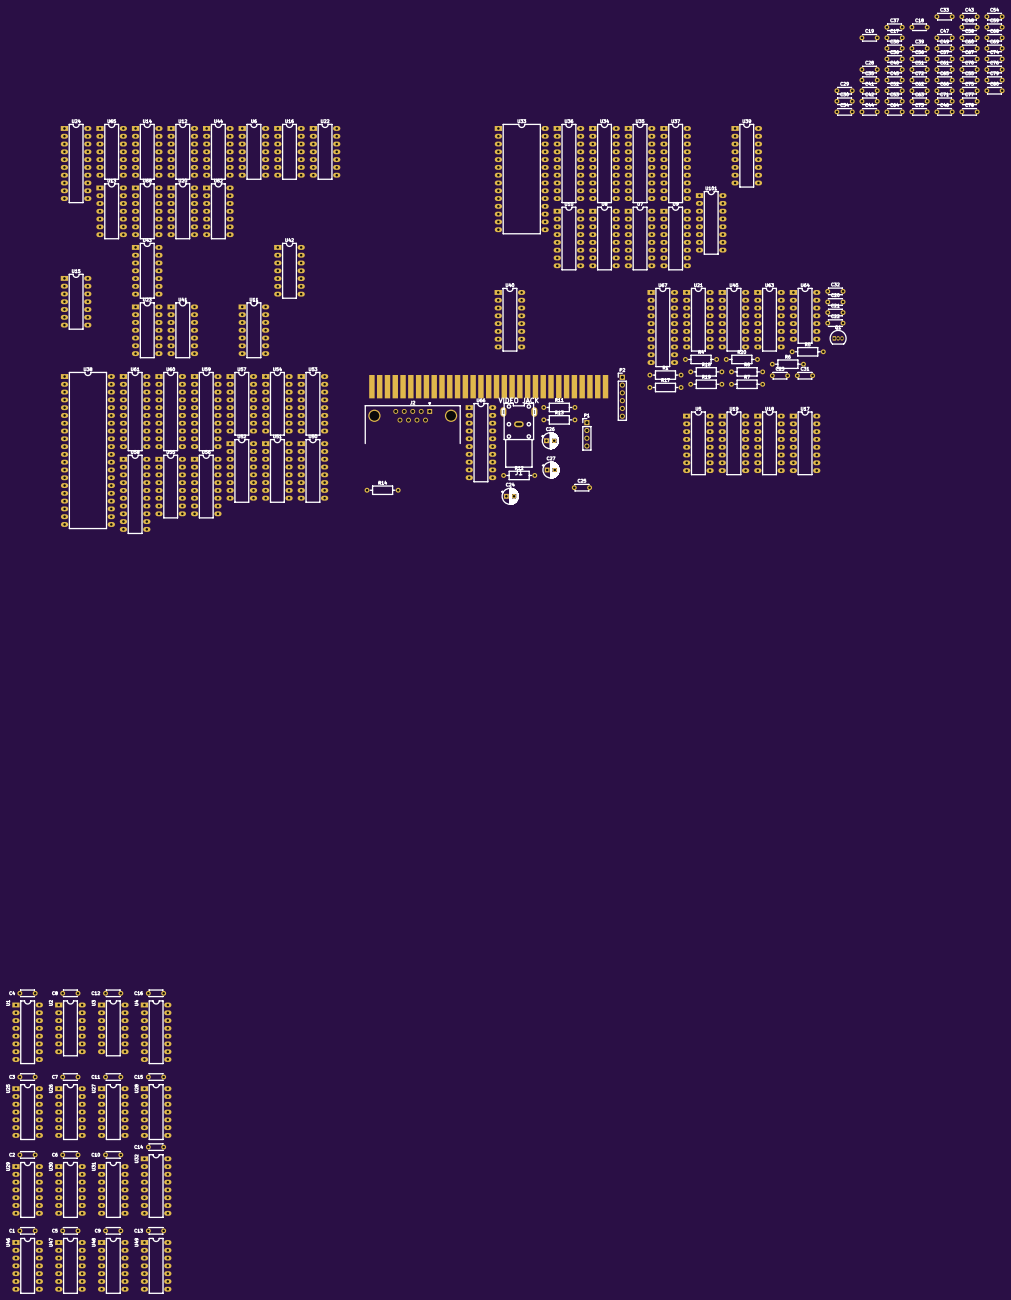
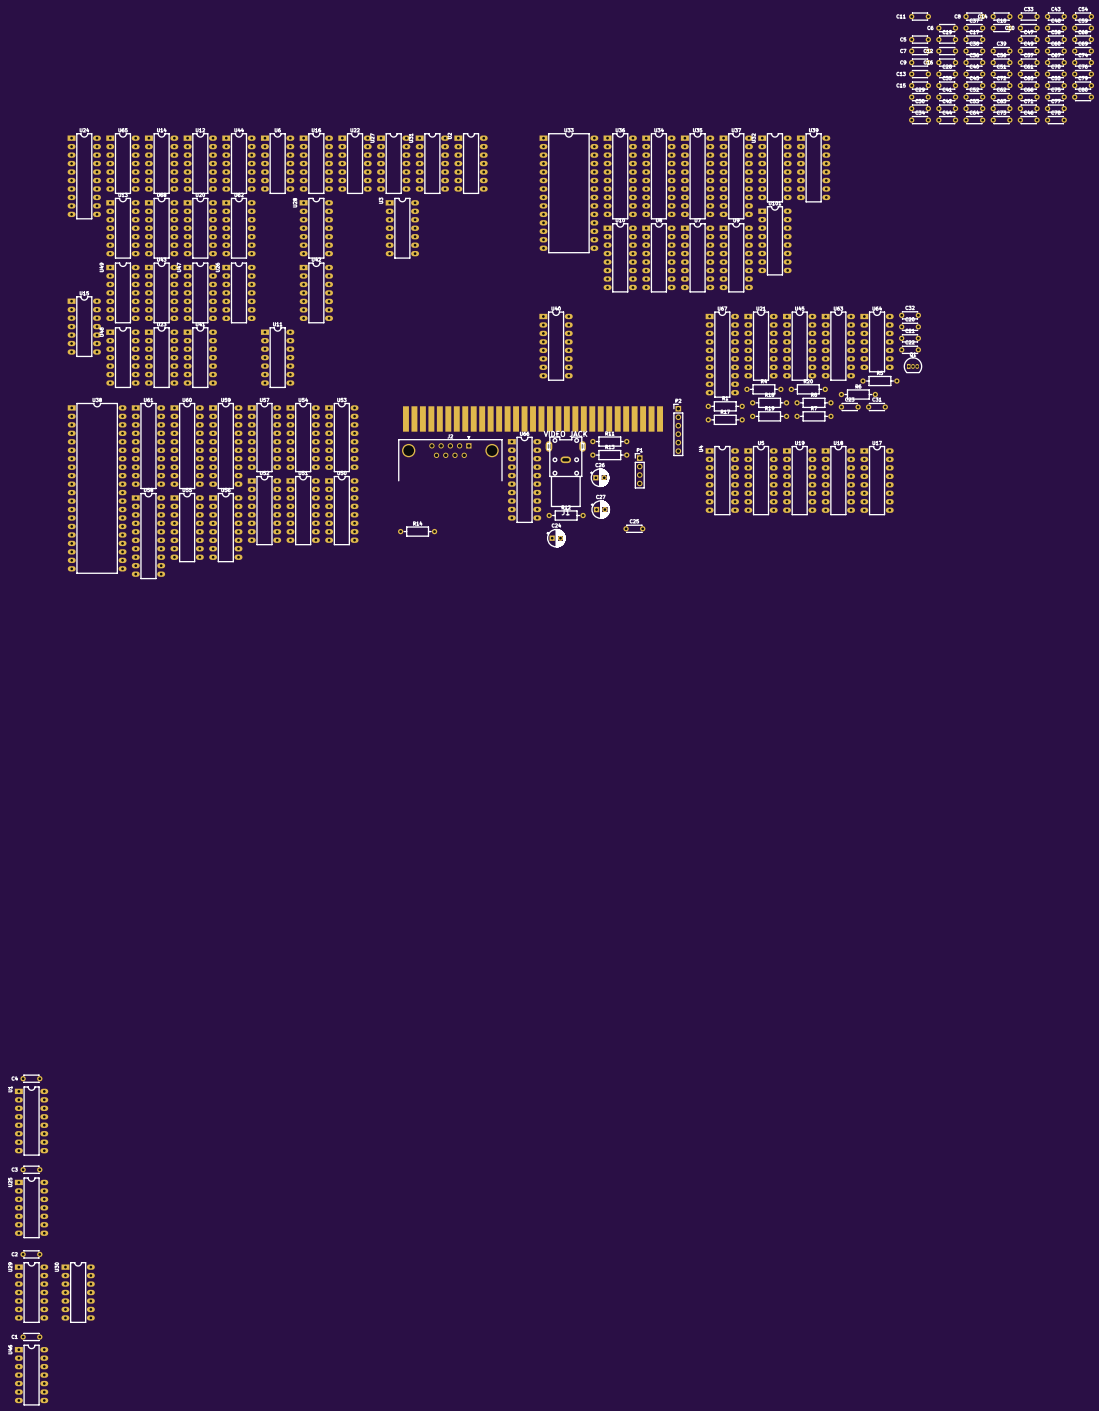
part position: (70, 993) -> (974, 16)
part position: (113, 993) -> (947, 51)
part position: (156, 993) -> (947, 62)
part position: (70, 1028) -> (471, 163)
part position: (113, 1028) -> (402, 228)
part position: (156, 1032) -> (722, 480)
part position: (70, 1077) -> (920, 51)
part position: (113, 1077) -> (920, 16)
part position: (156, 1077) -> (920, 85)
part position: (70, 1112) -> (238, 292)
part position: (113, 1112) -> (393, 163)
part position: (156, 1112) -> (316, 228)
part position: (156, 1147) -> (1001, 16)
part position: (70, 1154) -> (947, 28)
part position: (113, 1154) -> (1028, 28)
part position: (156, 1186) -> (774, 167)
part position: (113, 1189) -> (432, 163)
part position: (70, 1230) -> (920, 39)
part position: (113, 1230) -> (920, 62)
part position: (156, 1230) -> (920, 74)
part position: (70, 1265) -> (200, 292)
part position: (113, 1265) -> (122, 357)
part position: (156, 1265) -> (122, 292)

